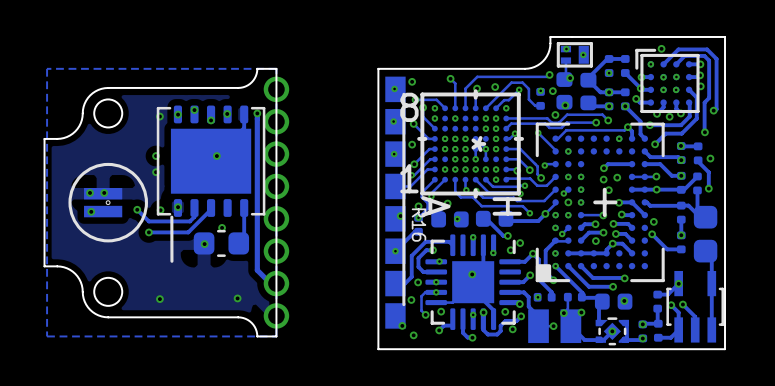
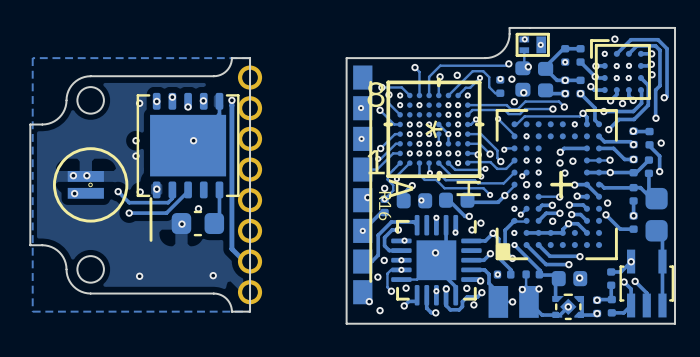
via: (412, 81) -> none
via: (394, 88) -> none
via: (412, 144) -> none

